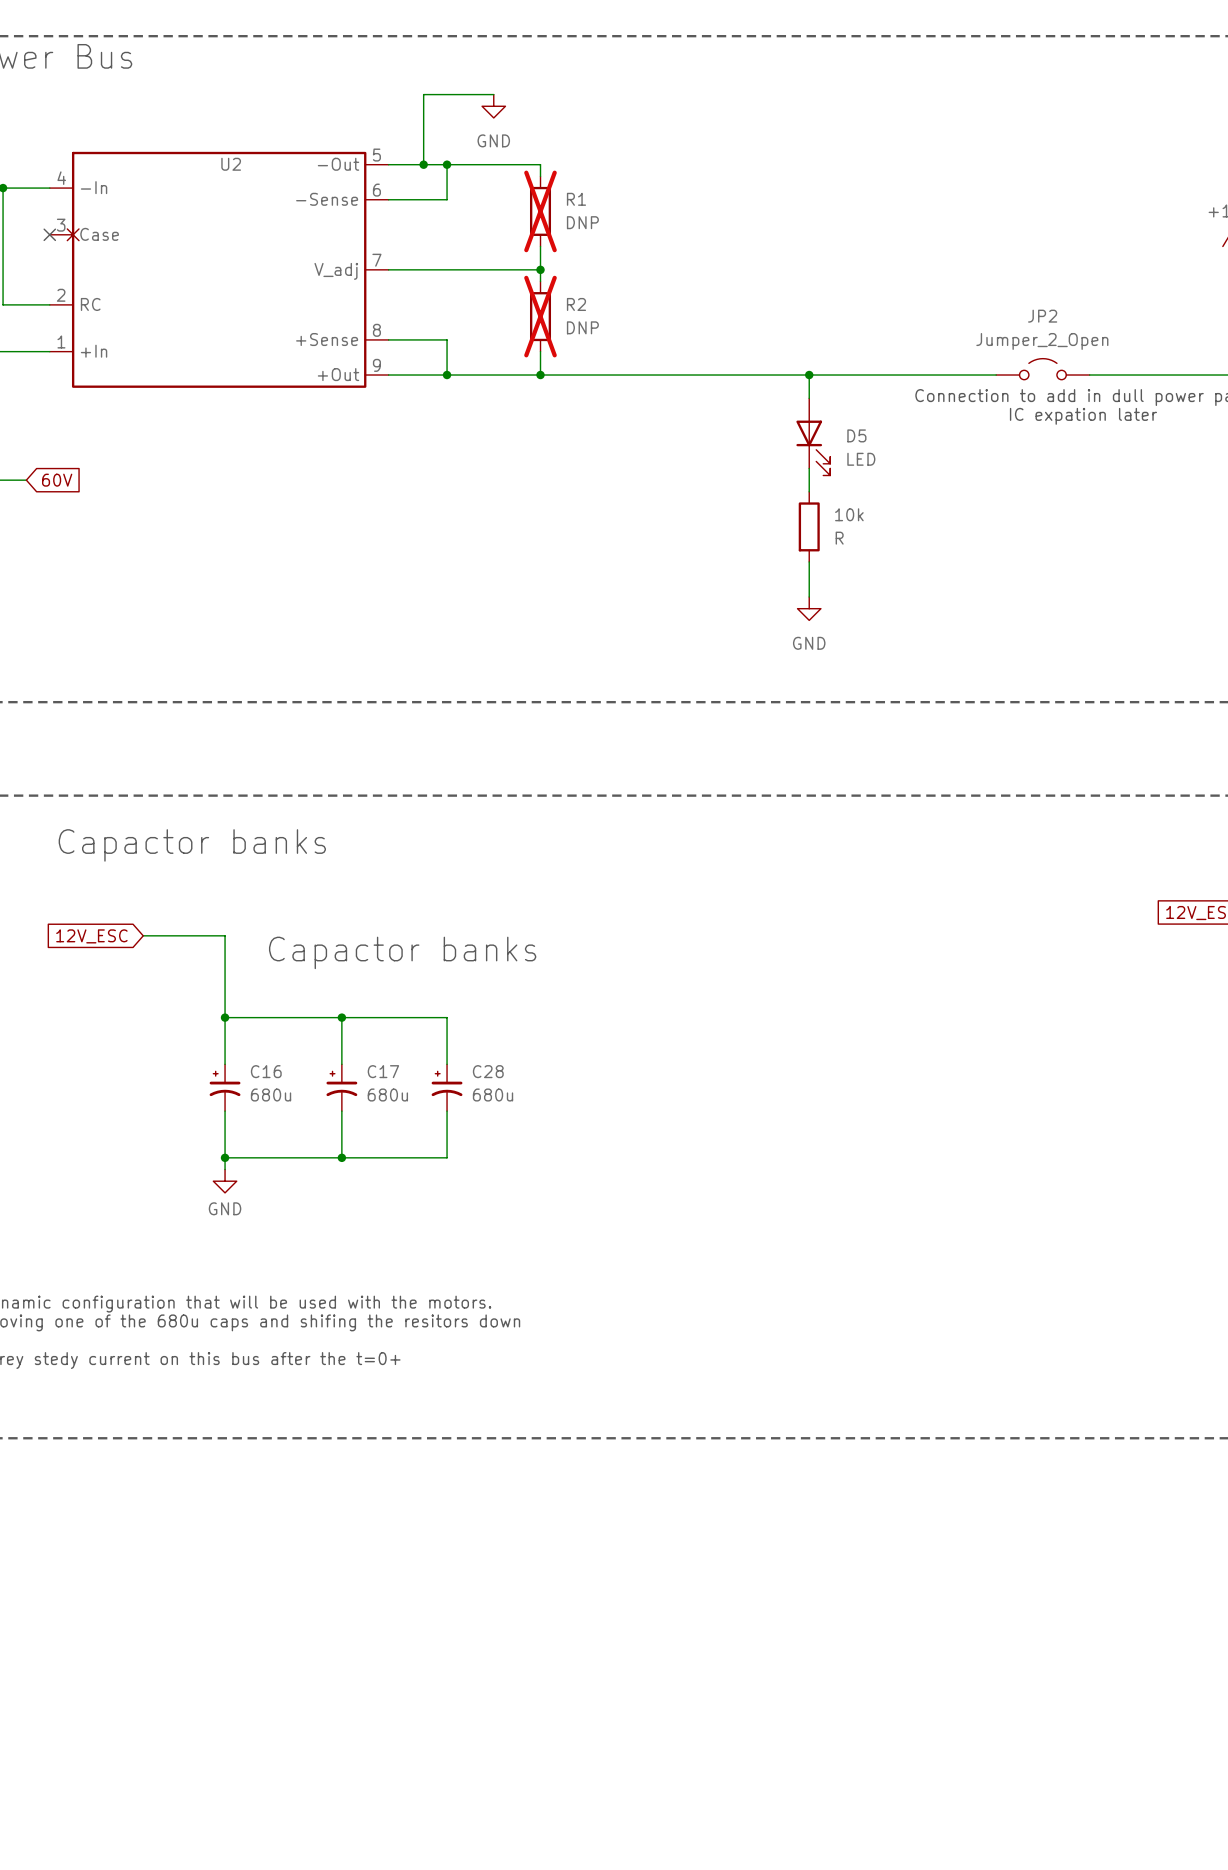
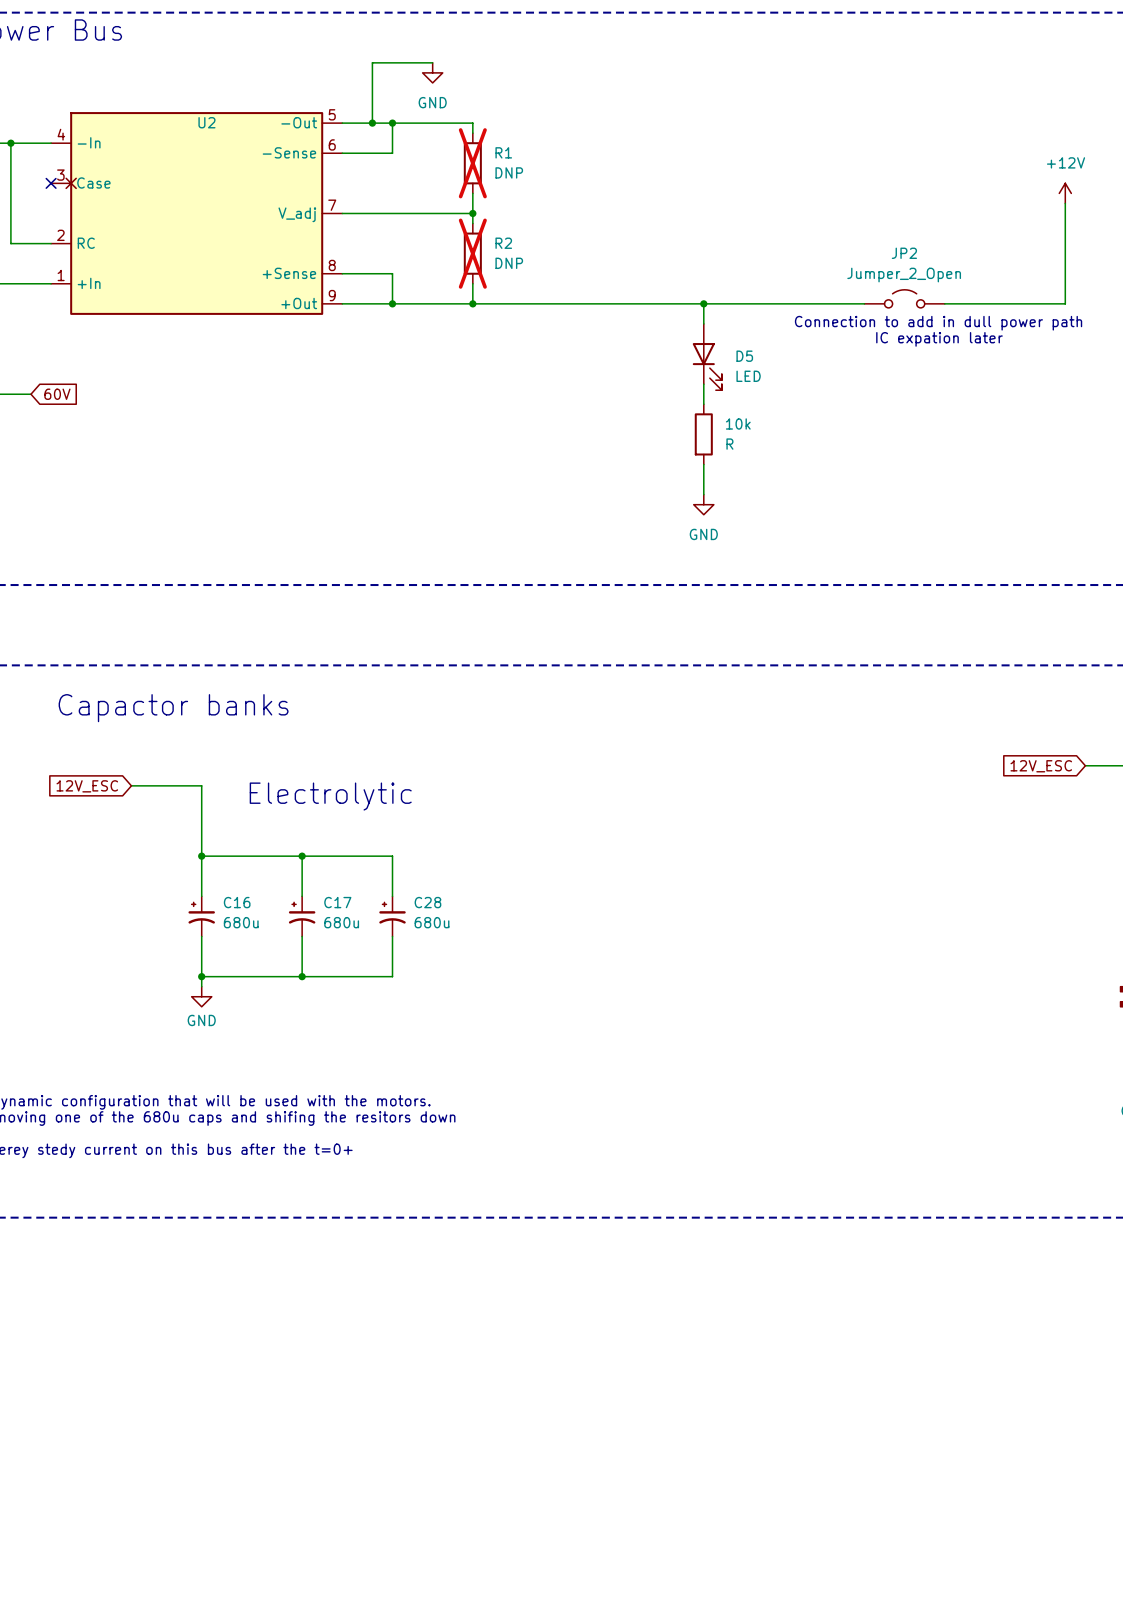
text: none -> Electrolytic (330, 796)
text: Capactor banks (402, 952) -> none

